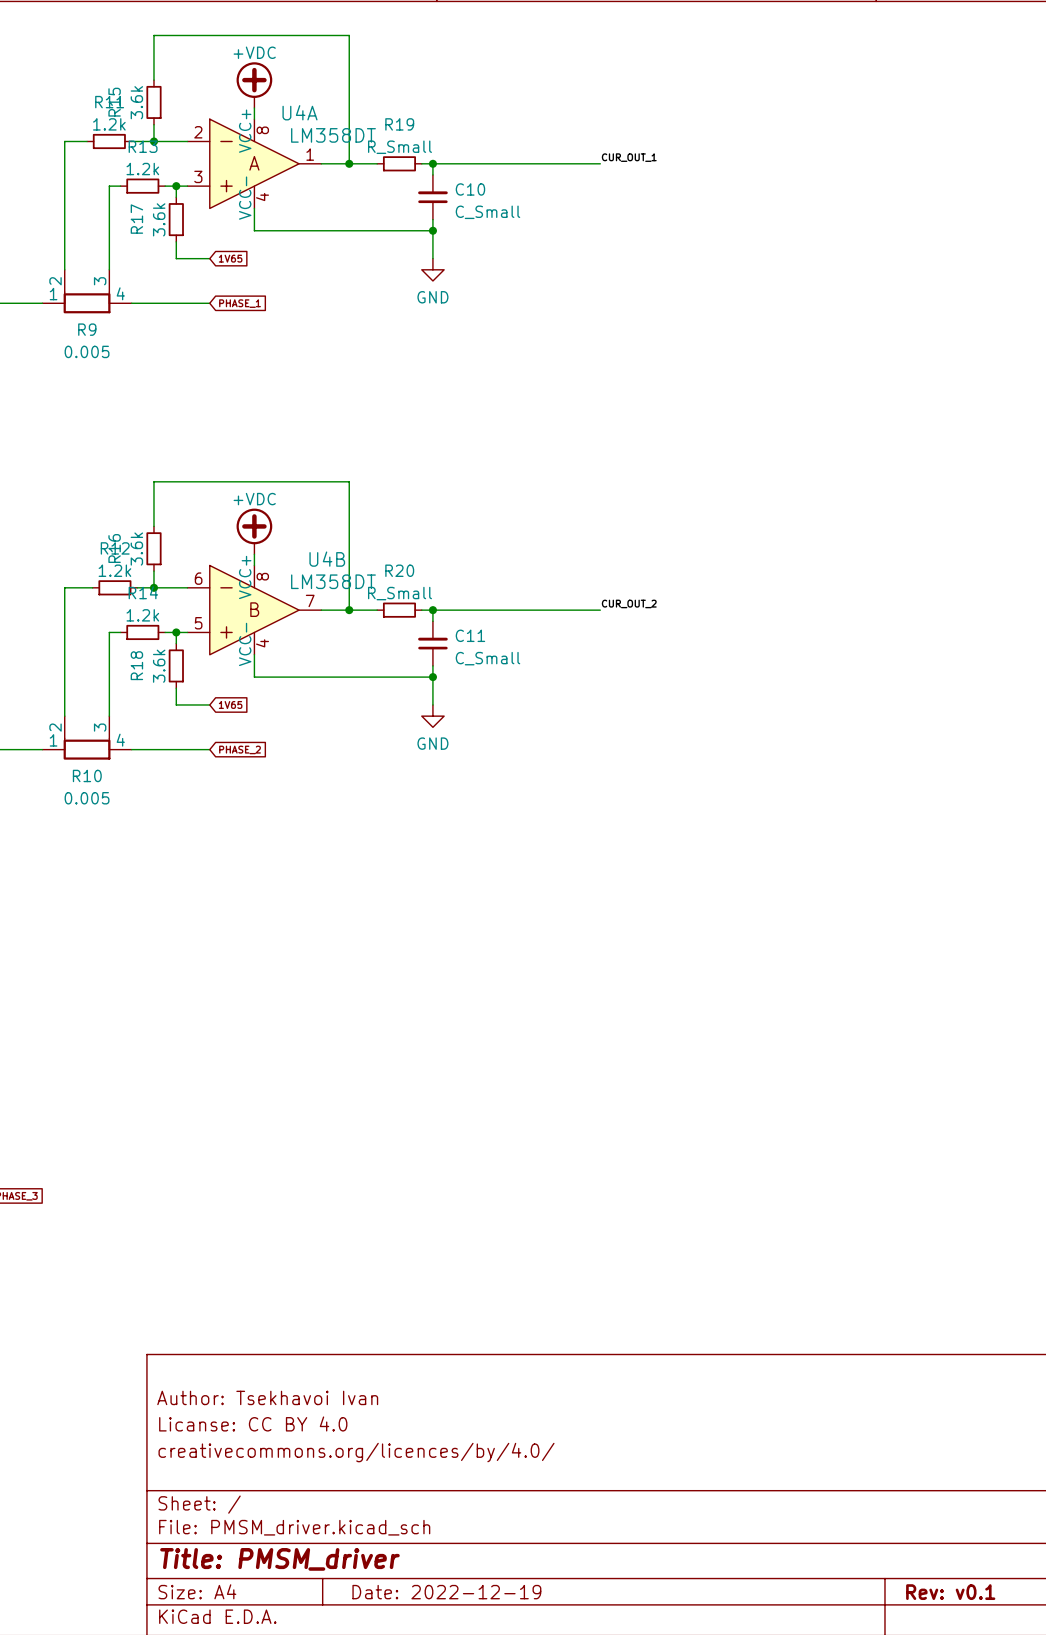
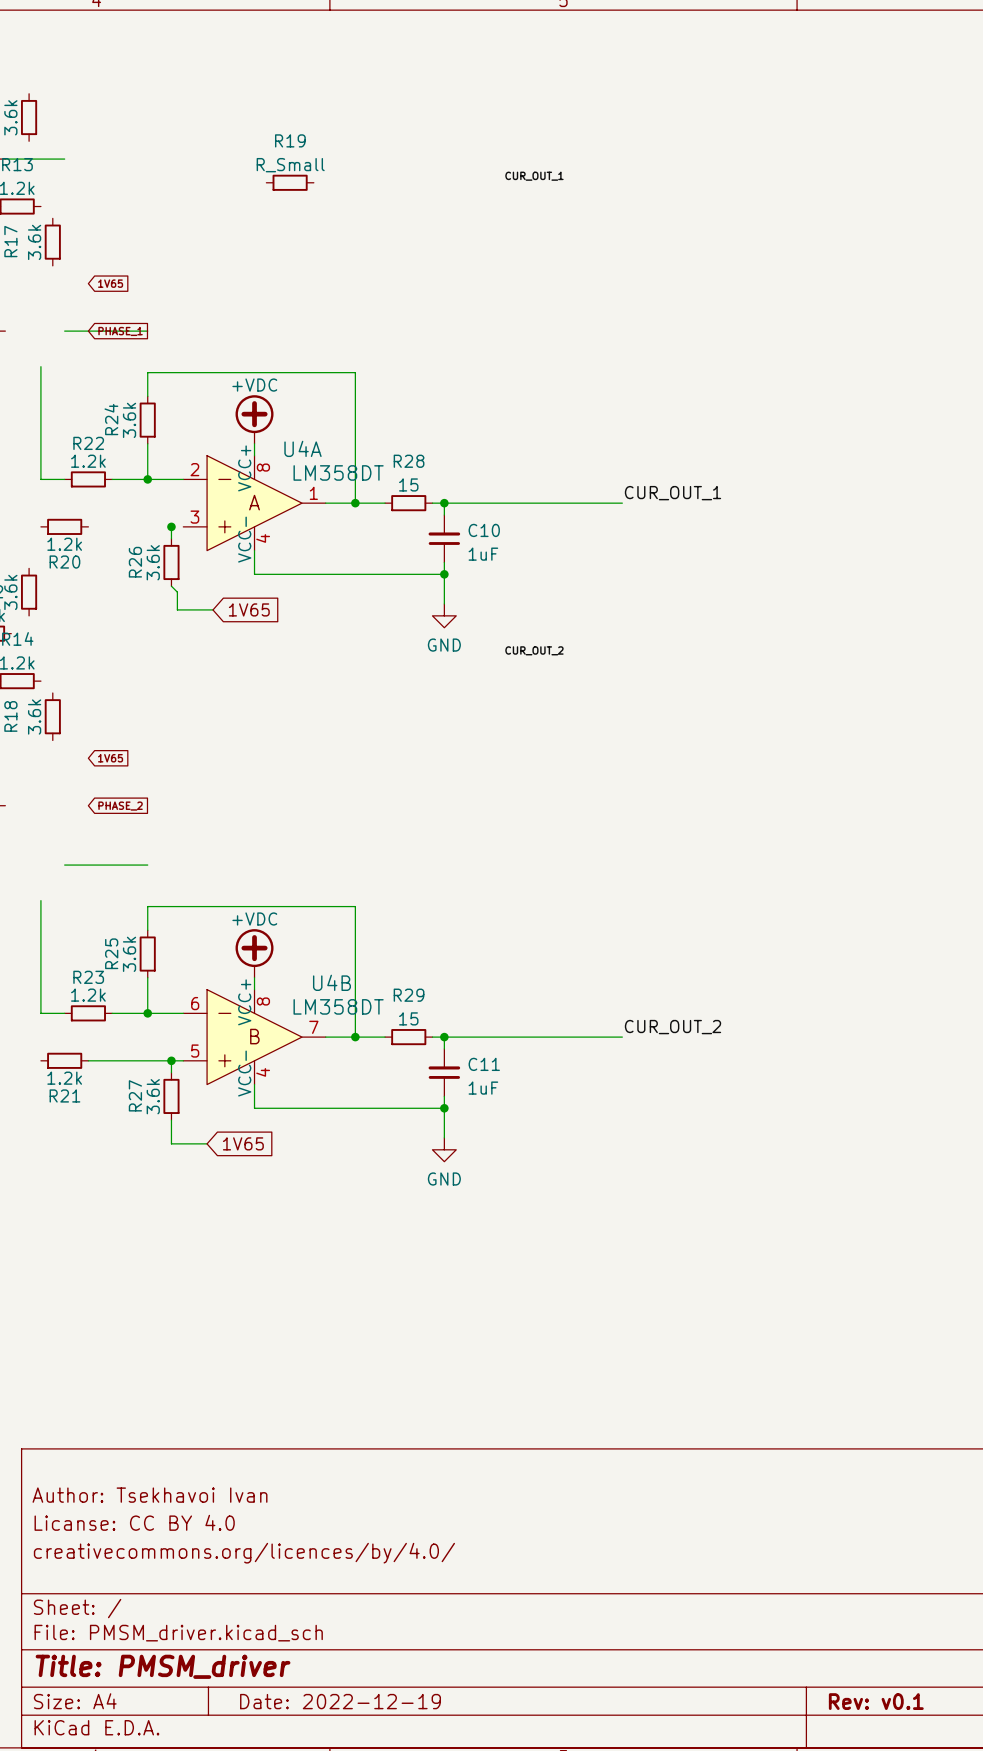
wire: (153, 80) (153, 35) (349, 35) (349, 163) -> none
power symbol: +VDC (254, 85) -> none
wire: (254, 108) (254, 119) -> none
wire: (153, 124) (153, 141) -> none
junction: (153, 141) -> none
U4A position: (254, 163) -> (254, 503)
wire: (321, 163) (377, 163) -> none
junction: (349, 163) -> none
wire: (421, 163) (600, 163) -> none
wire: (432, 163) (432, 174) -> none
junction: (432, 163) -> none
wire: (165, 186) (187, 186) -> none
wire: (176, 186) (176, 197) -> none
junction: (176, 186) -> none
C10 position: (432, 197) -> (444, 538)
wire: (254, 208) (254, 230) (432, 230) -> none
C10 value: C_Small (487, 212) -> 1uF (483, 554)
wire: (432, 219) (432, 258) -> none
junction: (432, 230) -> none
wire: (176, 241) (176, 258) (209, 258) -> none
power symbol: GND (432, 269) -> none
wire: (131, 303) (187, 303) -> (88, 331) (147, 331)
wire: none -> (40, 366) (40, 479) (64, 479)
wire: none -> (147, 396) (147, 372) (355, 372) (355, 503)
R24: none -> 3.6k (147, 420)
power symbol: none -> +VDC (254, 419)
wire: none -> (147, 443) (147, 479)
R22: none -> 1.2k (88, 479)
wire: none -> (112, 479) (183, 479)
junction: none -> (147, 479)
label: none -> CUR_OUT_1 (673, 493)
junction: none -> (355, 503)
R28: none -> 15 (408, 503)
junction: none -> (444, 503)
junction: none -> (171, 526)
R26: none -> 3.6k (171, 562)
wire: (153, 526) (153, 481) (349, 481) (349, 610) -> none
power symbol: +VDC (254, 531) -> none
junction: none -> (444, 574)
wire: none -> (171, 586) (177, 592) (177, 609) (212, 609)
wire: (254, 554) (254, 565) -> (254, 443) (254, 455)
global label: none -> 1V65 (249, 609)
R20 name position: R20 (399, 570) -> R20 (64, 562)
wire: (153, 571) (153, 587) -> none
power symbol: none -> GND (444, 615)
wire: (137, 587) (187, 587) -> none
junction: (153, 587) -> none
R20 value: R_Small (400, 593) -> 1.2k (64, 544)
U4B position: (254, 610) -> (254, 1037)
wire: (321, 610) (377, 610) -> (325, 503) (385, 503)
junction: (349, 610) -> none
R20 position: (399, 610) -> (64, 526)
wire: (421, 610) (600, 610) -> (432, 503) (622, 503)
wire: (432, 610) (432, 621) -> (444, 503) (444, 515)
junction: (432, 610) -> none
wire: (165, 632) (187, 632) -> none
wire: (176, 632) (176, 643) -> (171, 526) (171, 538)
junction: (176, 632) -> none
C11 position: (432, 643) -> (444, 1072)
wire: (254, 654) (254, 677) (432, 677) -> (254, 550) (254, 574) (444, 574)
C11 value: C_Small (487, 658) -> 1uF (483, 1088)
wire: (432, 665) (432, 704) -> (444, 562) (444, 604)
junction: (432, 677) -> none
wire: (176, 688) (176, 704) (209, 704) -> none
power symbol: GND (432, 716) -> none
wire: (131, 749) (209, 749) -> (64, 865) (147, 865)
wire: none -> (40, 900) (40, 1013) (64, 1013)
wire: none -> (147, 930) (147, 906) (355, 906) (355, 1037)
power symbol: none -> +VDC (254, 953)
R25: none -> 3.6k (147, 954)
wire: none -> (147, 977) (147, 1013)
wire: none -> (254, 977) (254, 989)
R23: none -> 1.2k (88, 1013)
wire: none -> (112, 1013) (183, 1013)
junction: none -> (147, 1013)
label: none -> CUR_OUT_2 (673, 1027)
wire: none -> (325, 1037) (385, 1037)
junction: none -> (355, 1037)
R29: none -> 15 (408, 1037)
wire: none -> (432, 1037) (622, 1037)
wire: none -> (444, 1037) (444, 1048)
junction: none -> (444, 1037)
R21: none -> 1.2k (64, 1060)
wire: none -> (88, 1060) (183, 1060)
wire: none -> (171, 1060) (171, 1072)
junction: none -> (171, 1060)
wire: none -> (254, 1084) (254, 1108) (444, 1108)
R27: none -> 3.6k (171, 1096)
wire: none -> (444, 1096) (444, 1137)
junction: none -> (444, 1108)
wire: none -> (171, 1120) (171, 1143) (207, 1143)
global label: none -> 1V65 (243, 1143)
power symbol: none -> GND (444, 1149)

